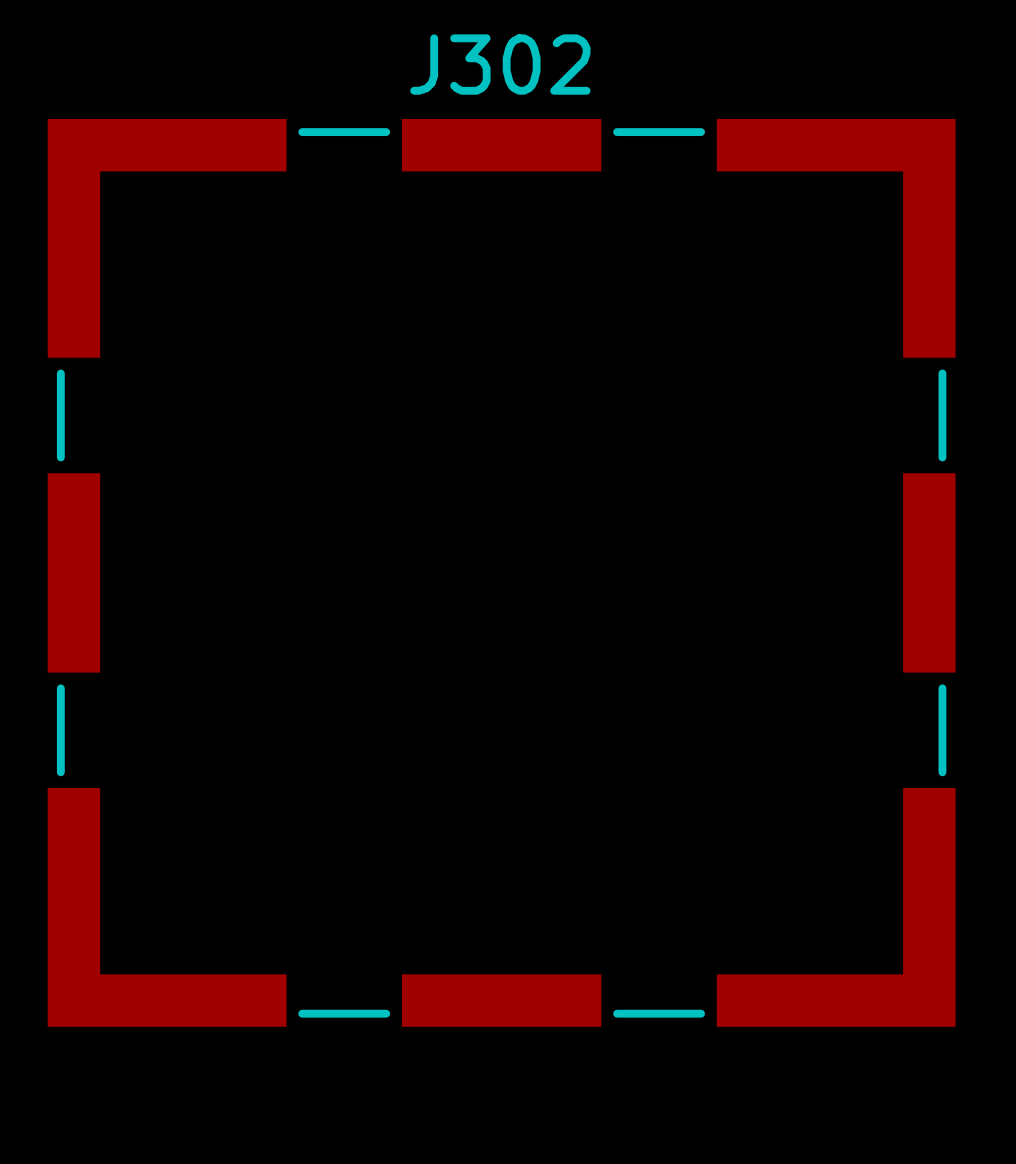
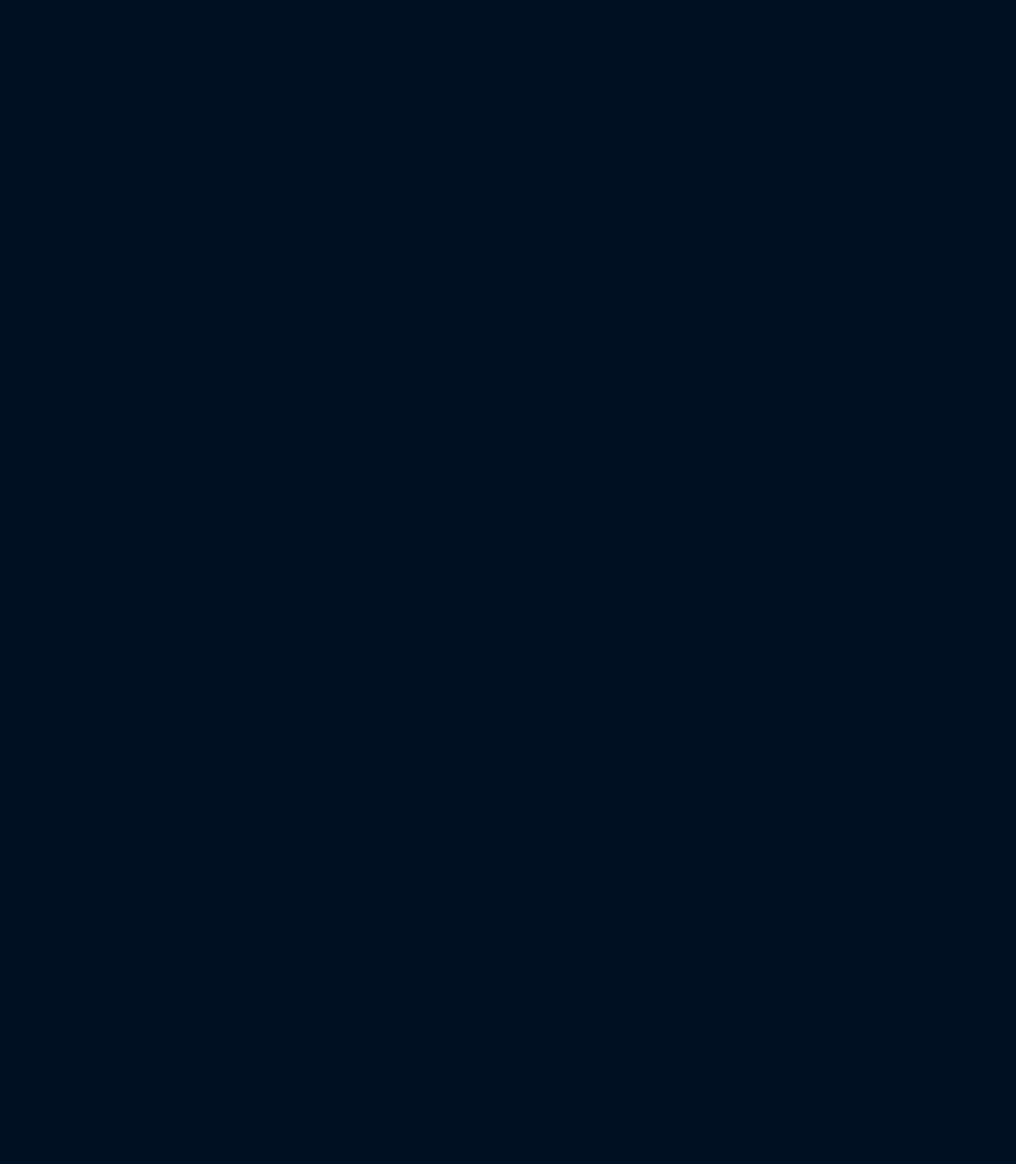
J302: (501, 572) -> none

